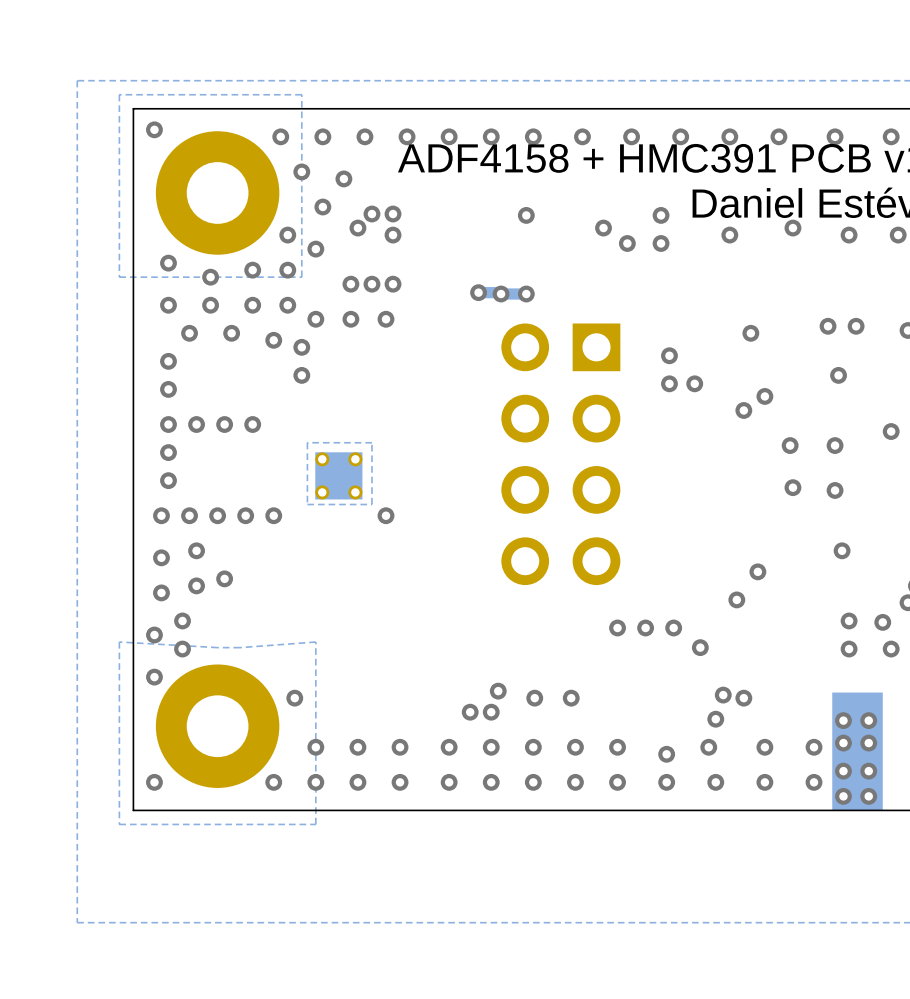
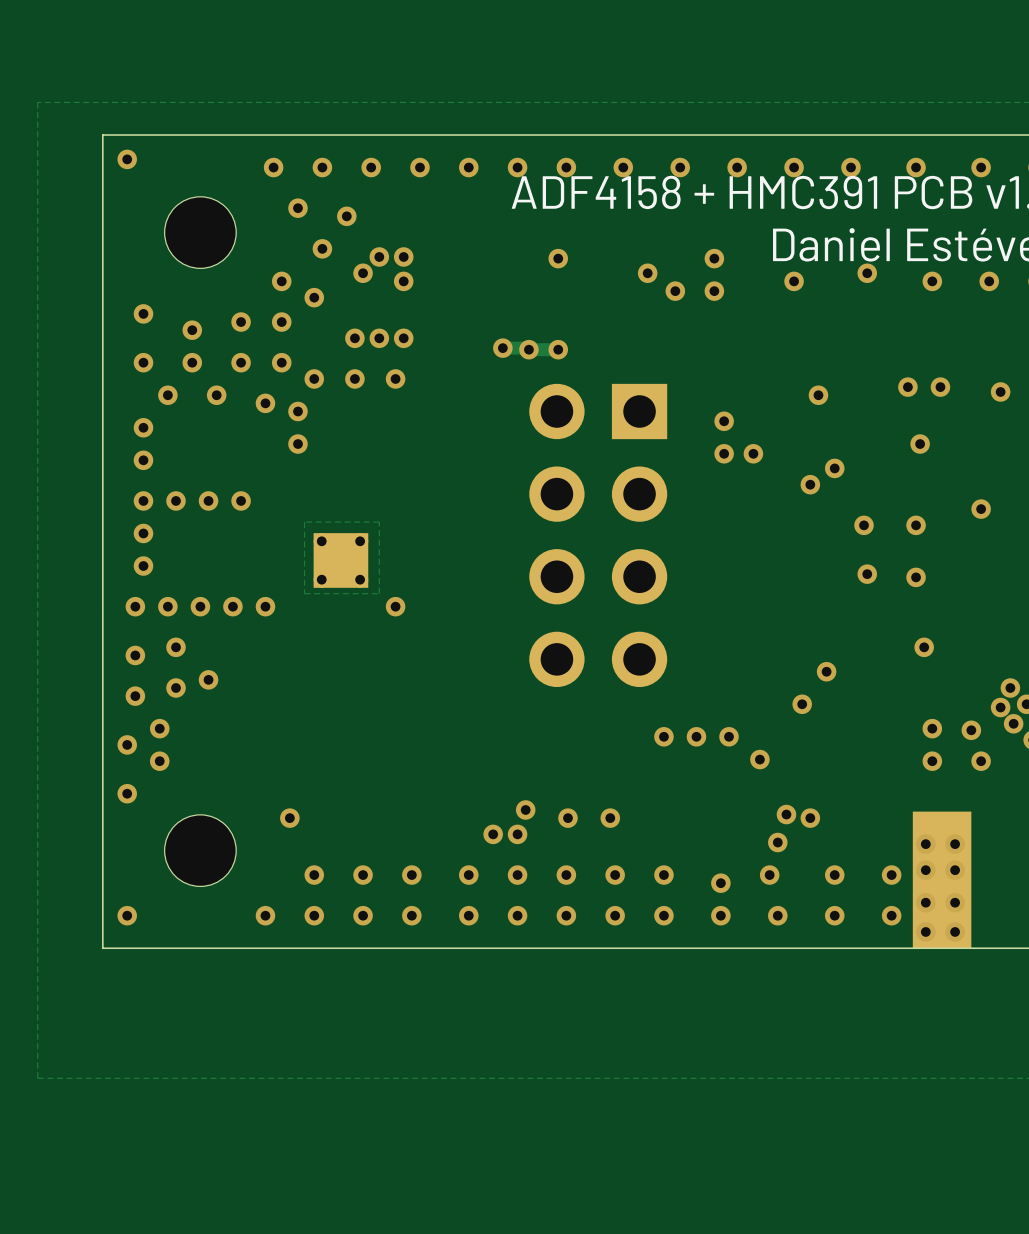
zone outline: (301, 94) (119, 94) (119, 277) (301, 277) (301, 94) -> none
part footprint: [155, 131, 280, 255] -> [164, 196, 237, 269]
zone outline: (315, 642) (240, 647) (119, 642) (119, 824) (315, 824) (315, 642) -> none
part footprint: [155, 664, 280, 788] -> [164, 814, 237, 887]

